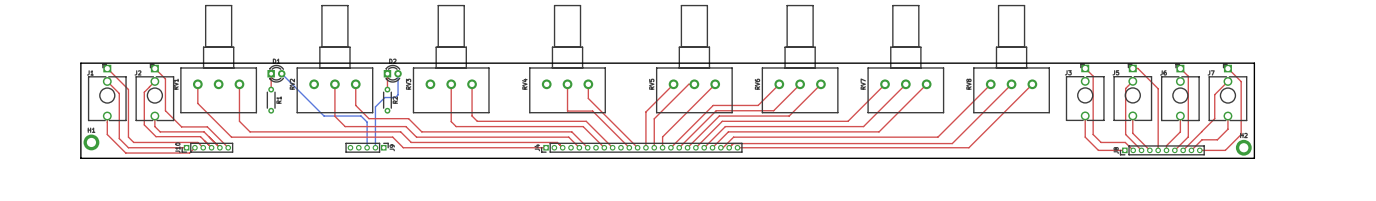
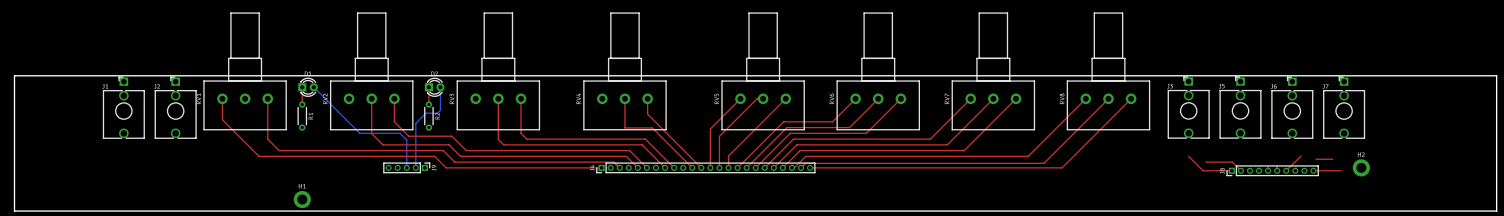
board edge: (80, 63) (80, 158) (1254, 158) (1254, 63) -> (95, 75) (14, 75) (14, 211) (1496, 211) (1496, 75) (1372, 75)
top track: (107, 68) (128, 89) (128, 137) (133, 142) (197, 142) (203, 147) -> none
top track: (154, 68) (165, 78) (165, 110) (181, 126) (207, 126) (228, 147) -> none
top track: (1085, 68) (1093, 76) (1093, 134) (1101, 142) -> none
top track: (1132, 68) (1137, 68) (1158, 88) (1158, 146) -> none
top track: (1180, 68) (1188, 76) (1188, 136) -> none
top track: (1227, 68) (1241, 81) (1241, 134) (1225, 150) -> none
top track: (107, 81) (119, 93) (119, 138) (128, 147) (186, 147) -> none
top track: (154, 81) (144, 92) (144, 124) (156, 136) (200, 136) (211, 147) -> none
top track: (1132, 81) (1125, 88) (1125, 134) (1141, 150) -> none
top track: (1227, 81) (1214, 94) (1214, 118) (1183, 150) -> none
top track: (1085, 115) (1085, 137) -> none
top track: (1132, 115) (1132, 133) (1149, 150) -> none
top track: (107, 116) (107, 134) (125, 153) (189, 153) (194, 147) -> none
top track: (154, 116) (154, 126) (160, 131) (204, 131) (219, 147) -> none
top track: (1180, 116) (1180, 131) (1166, 145) -> none
top track: (1227, 116) (1227, 129) (1217, 139) -> none
top track: (1202, 139) (1191, 150) -> none
part position: (91, 142) -> (302, 199)
part: (207, 147) -> none

